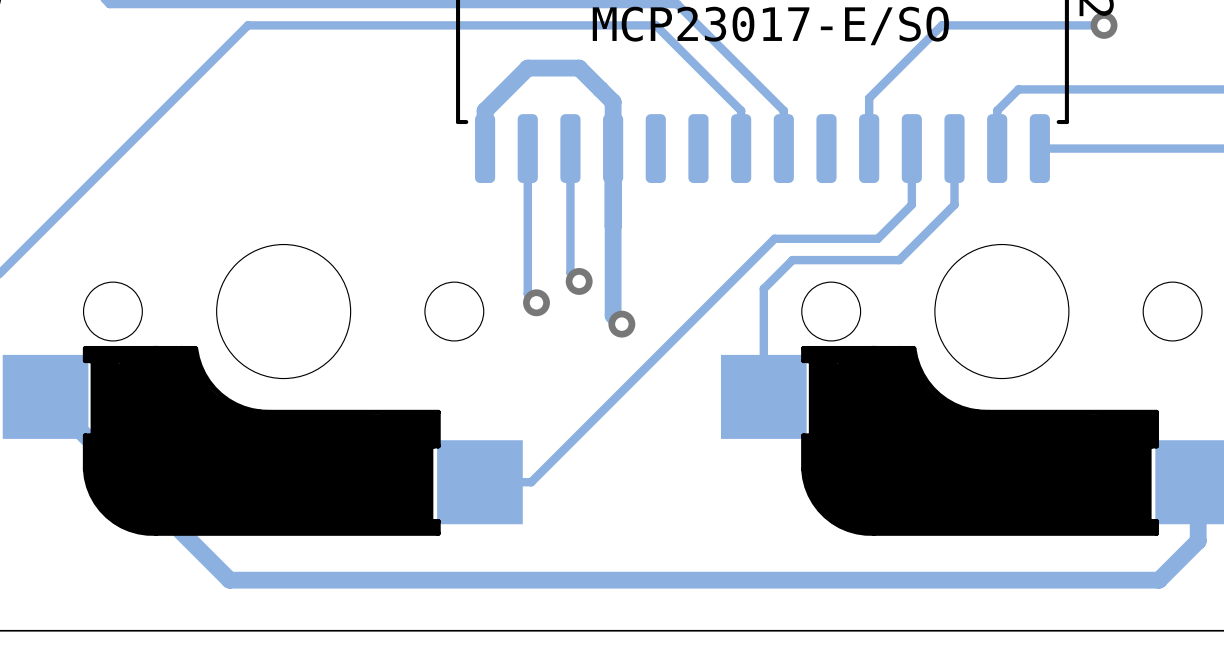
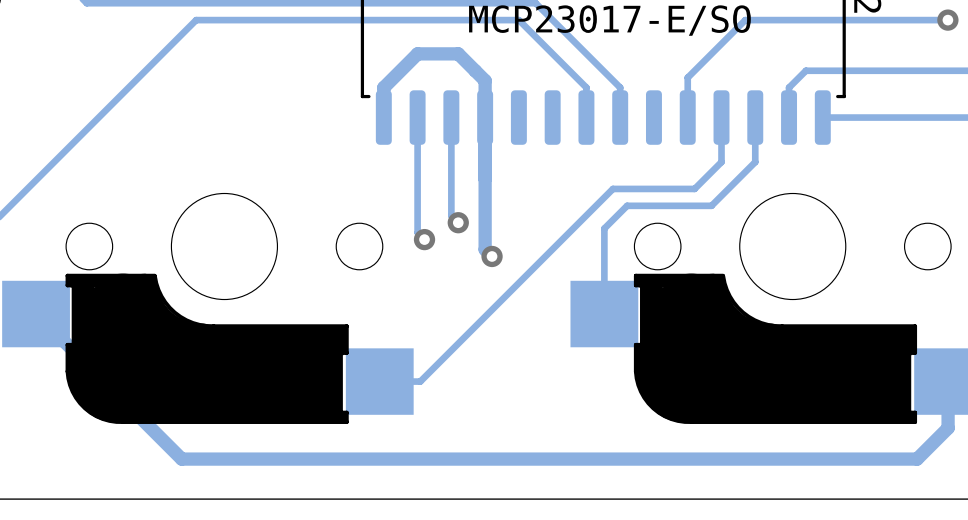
via position: (1104, 25) -> (947, 20)
track: none -> (947, 20) (873, 20)

